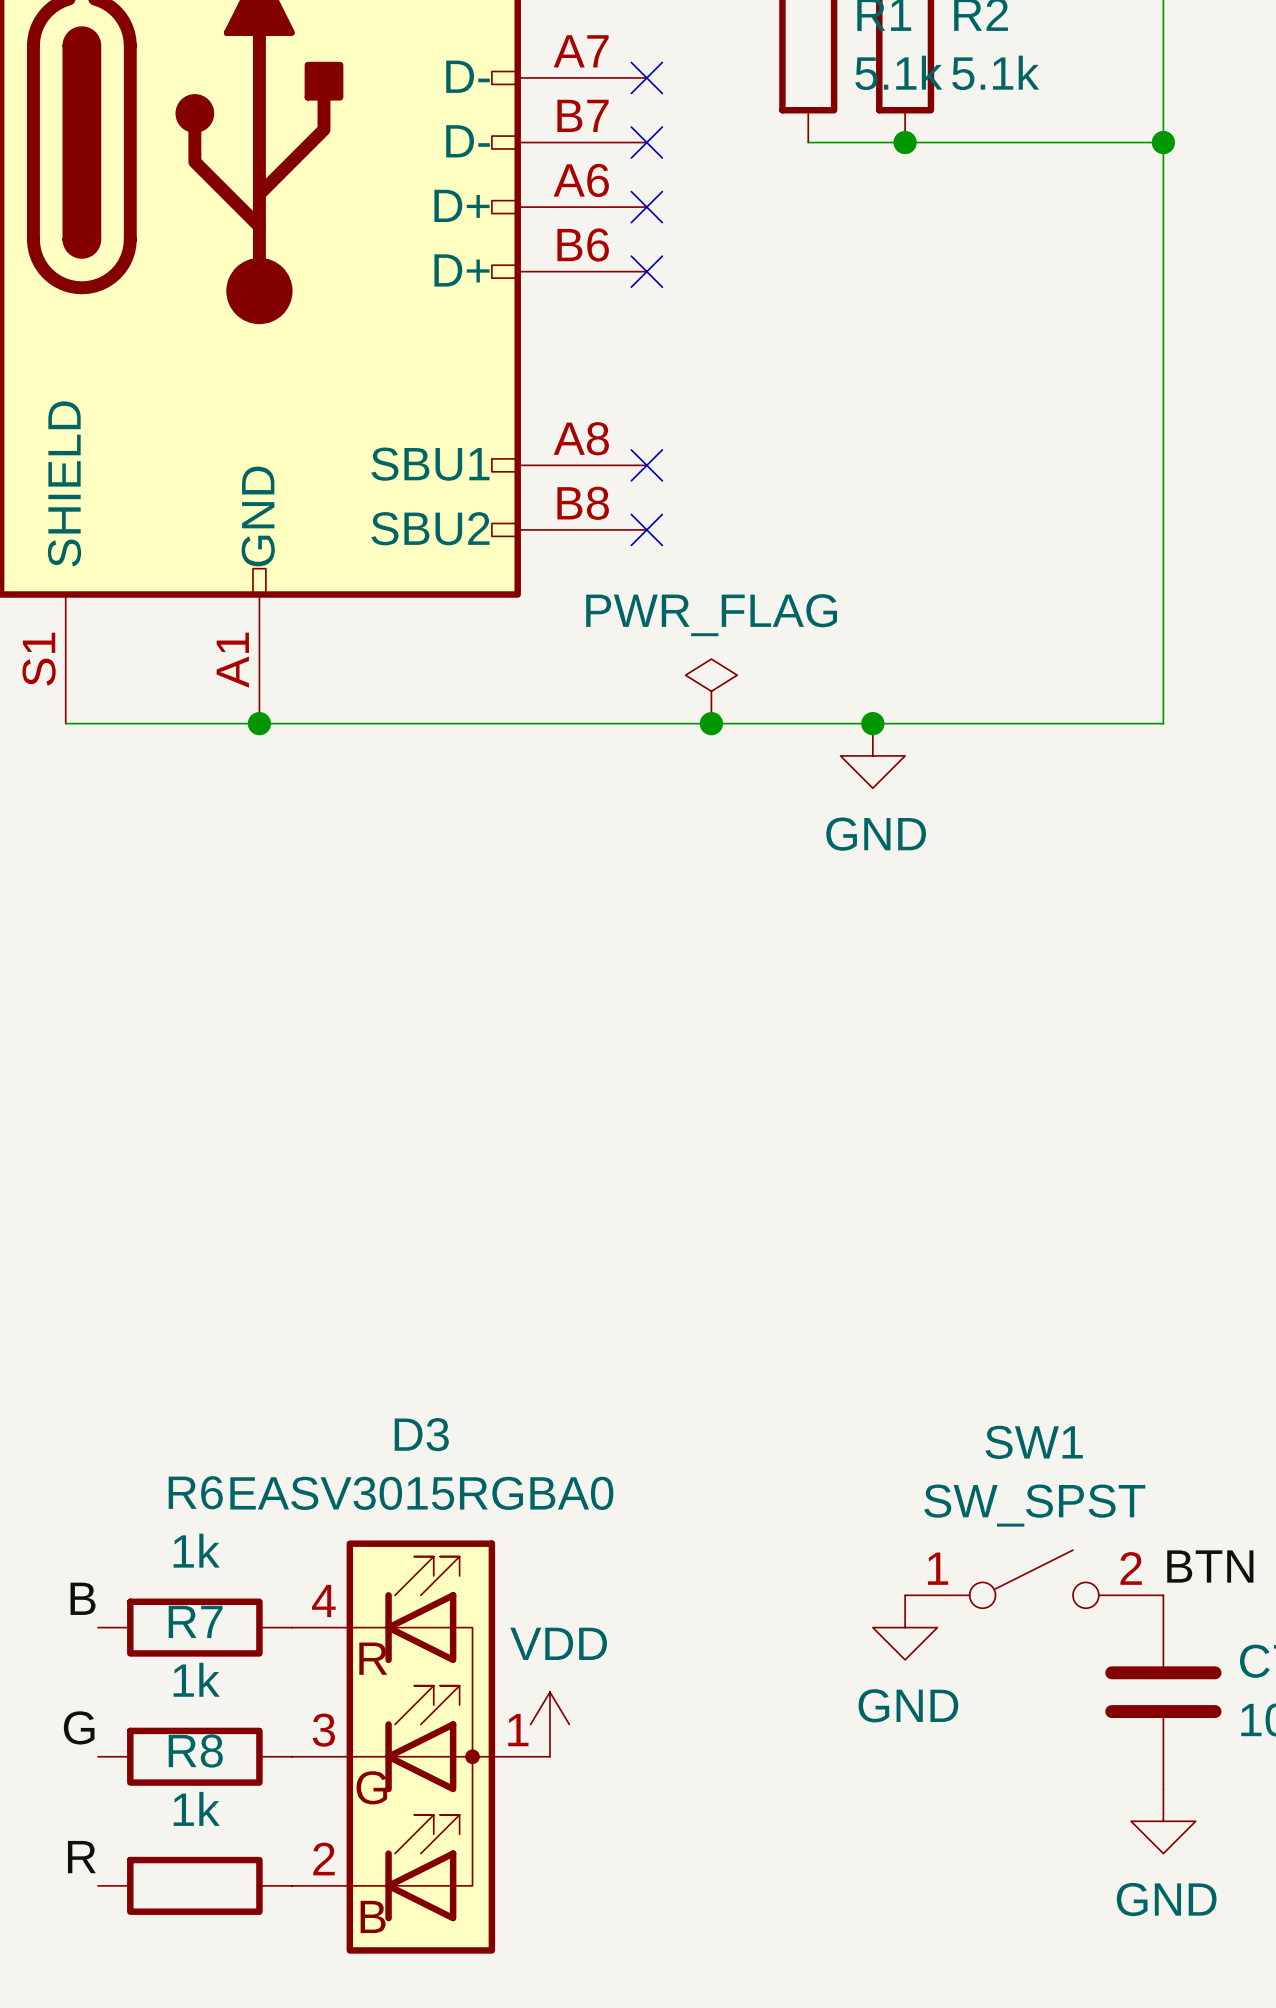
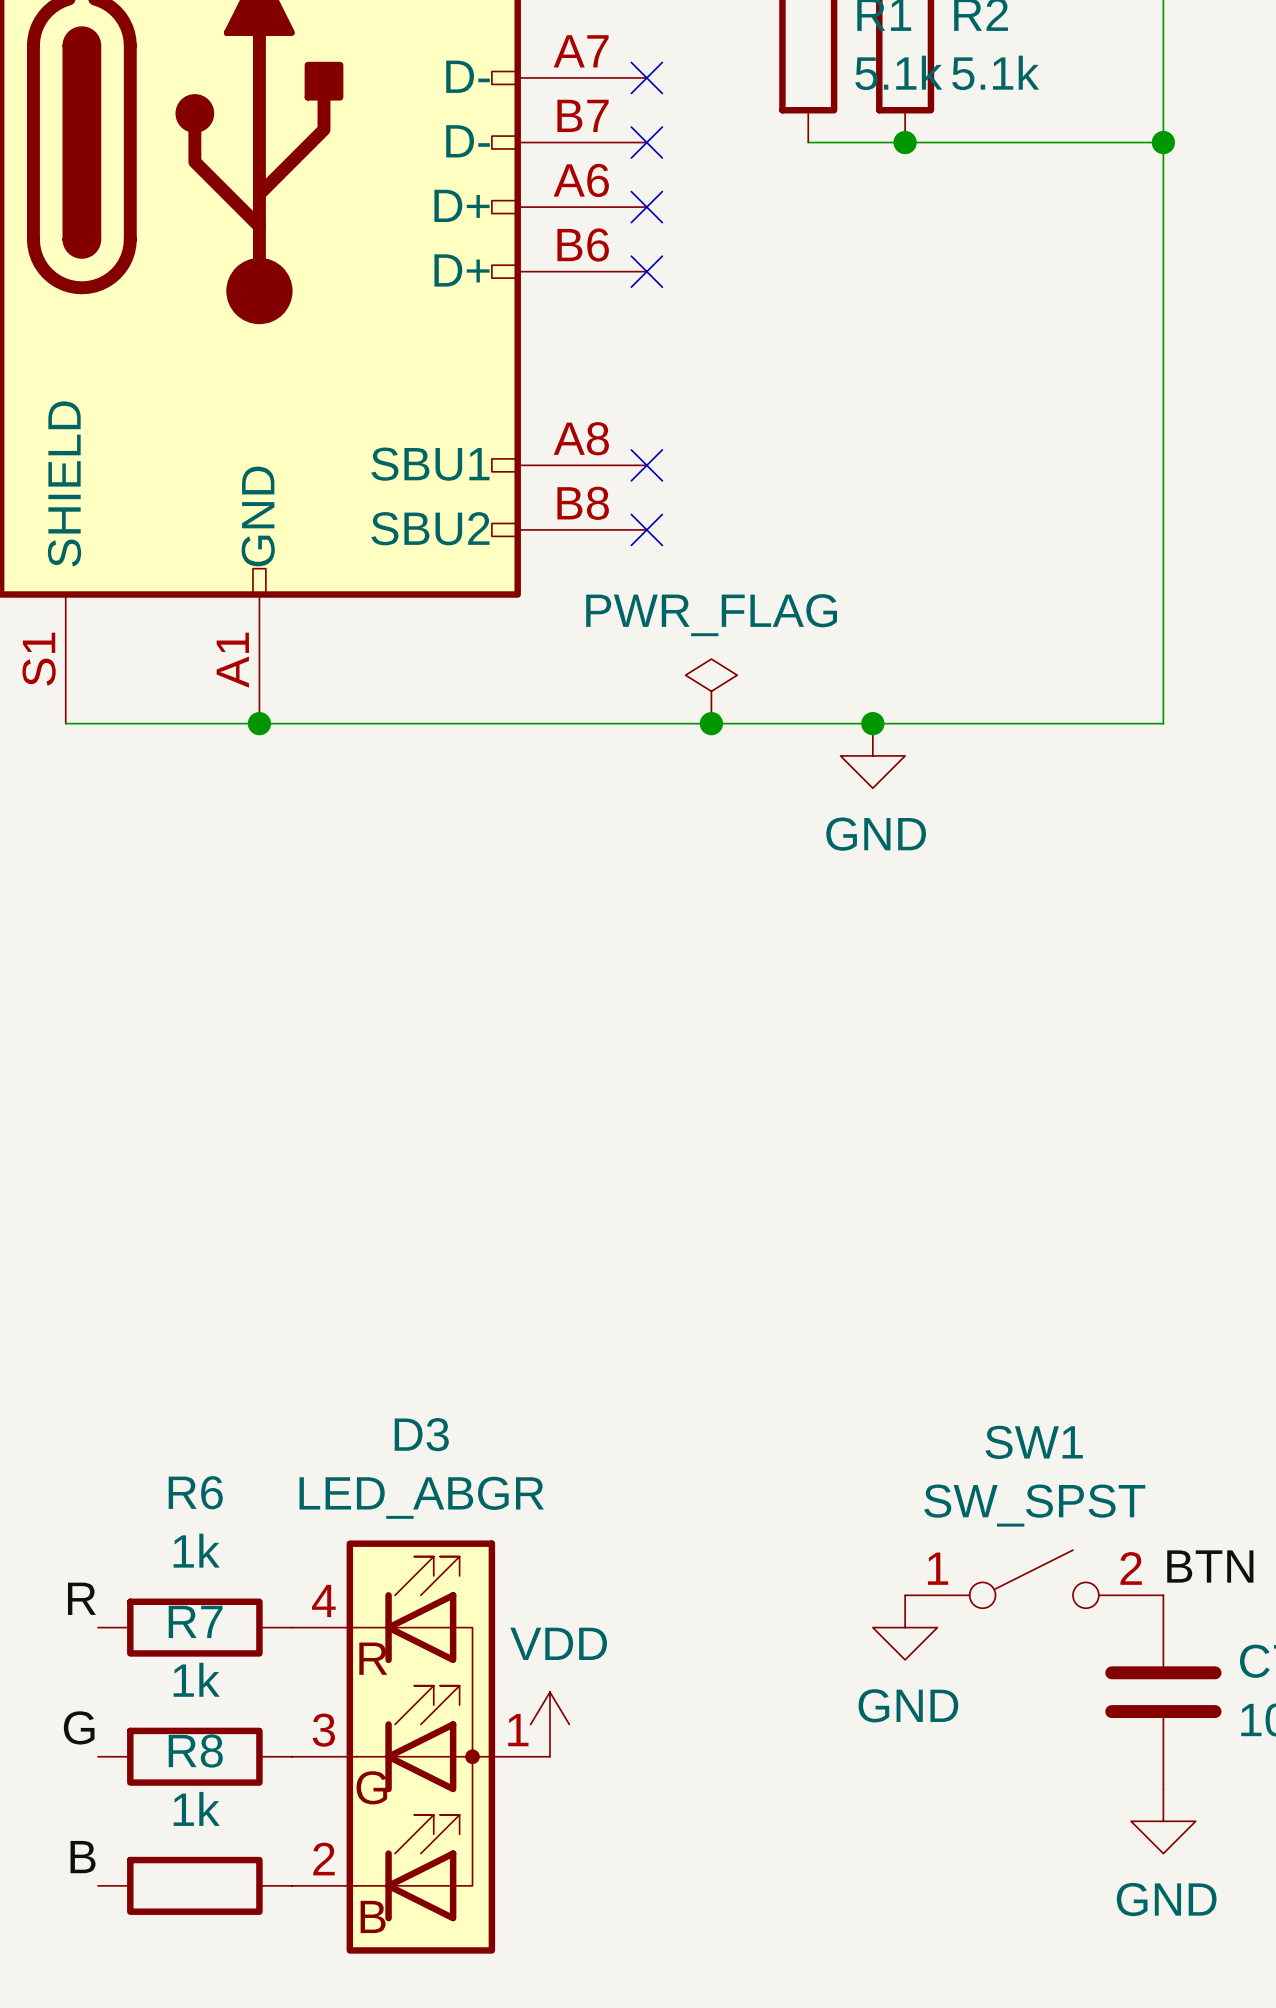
D3 value: EASV3015RGBA0 (421, 1493) -> LED_ABGR (421, 1497)
label: B (83, 1598) -> R (81, 1598)
label: R (81, 1857) -> B (83, 1857)

